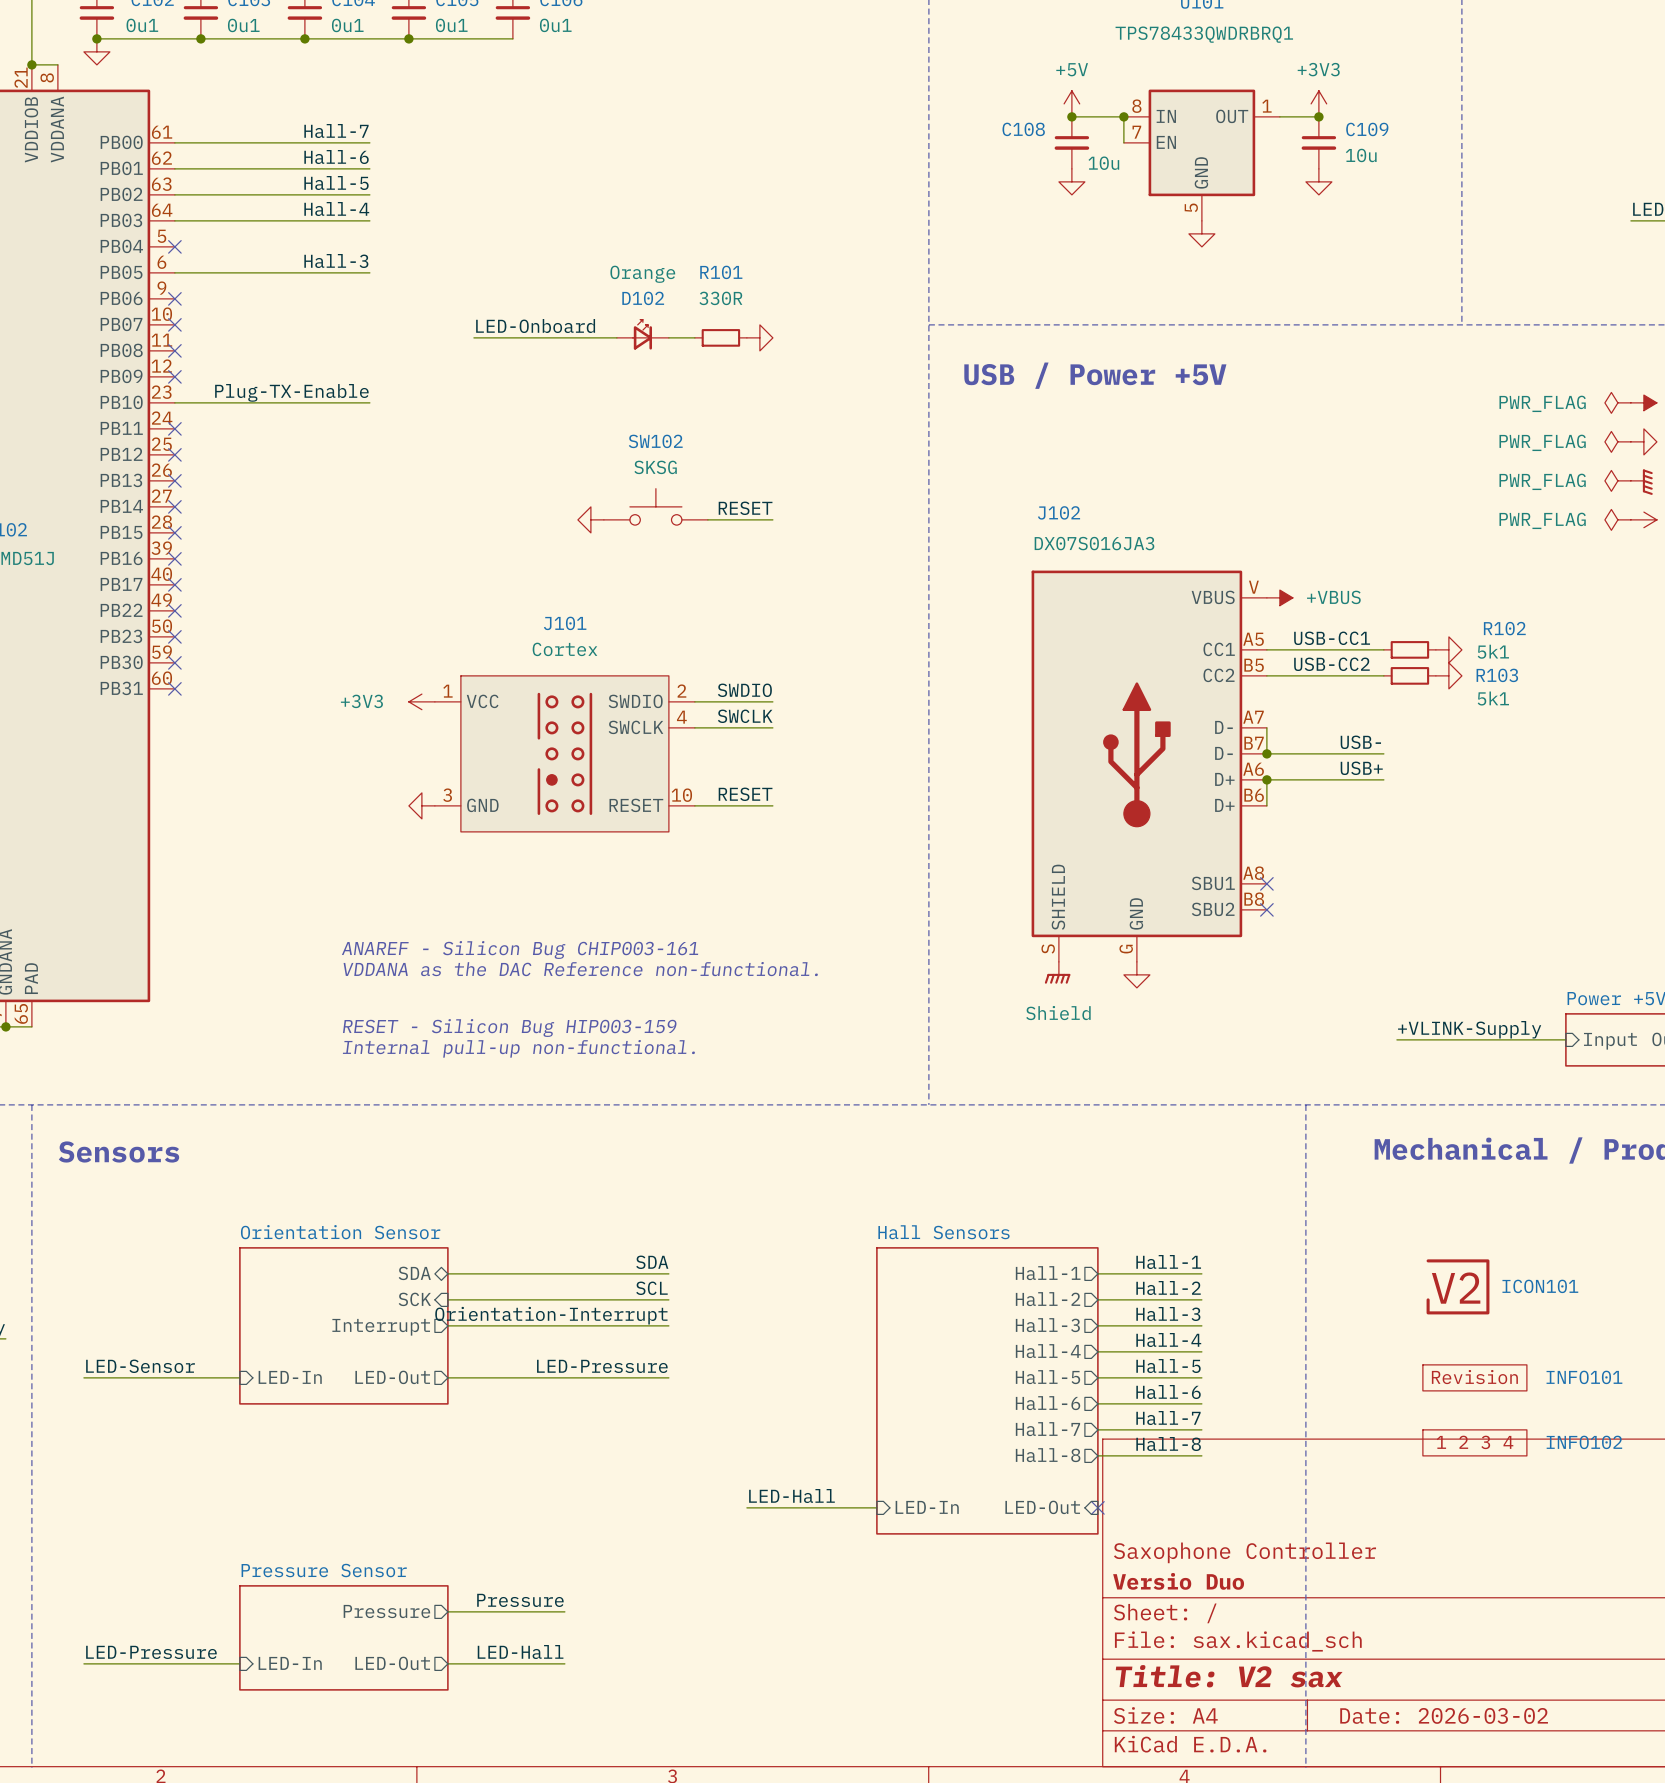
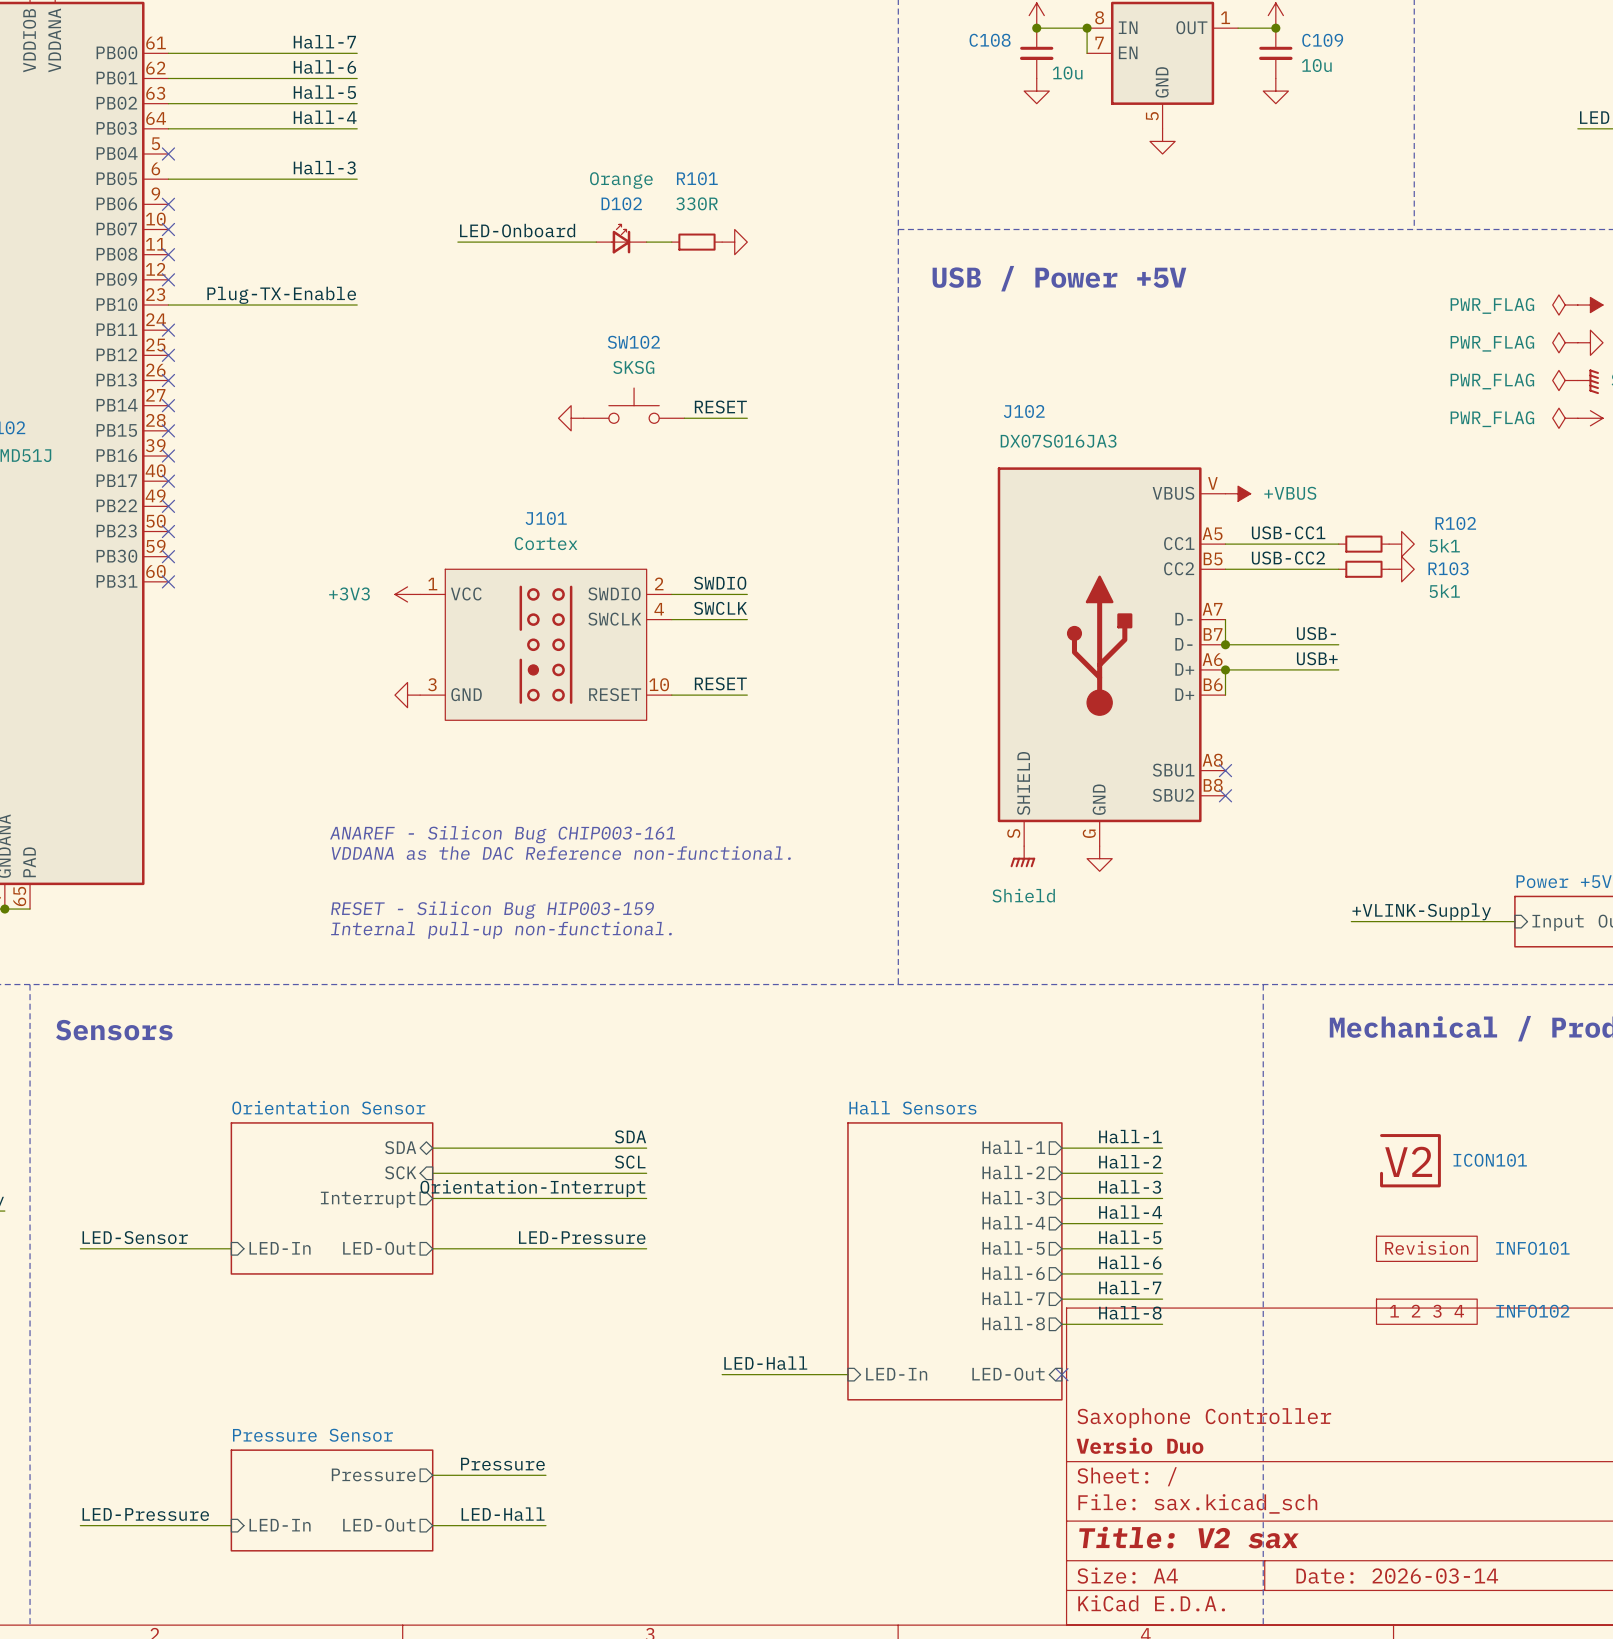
title block: Date: 2026-03-02 (1444, 1715) -> Date: 2026-03-14 (1397, 1576)

